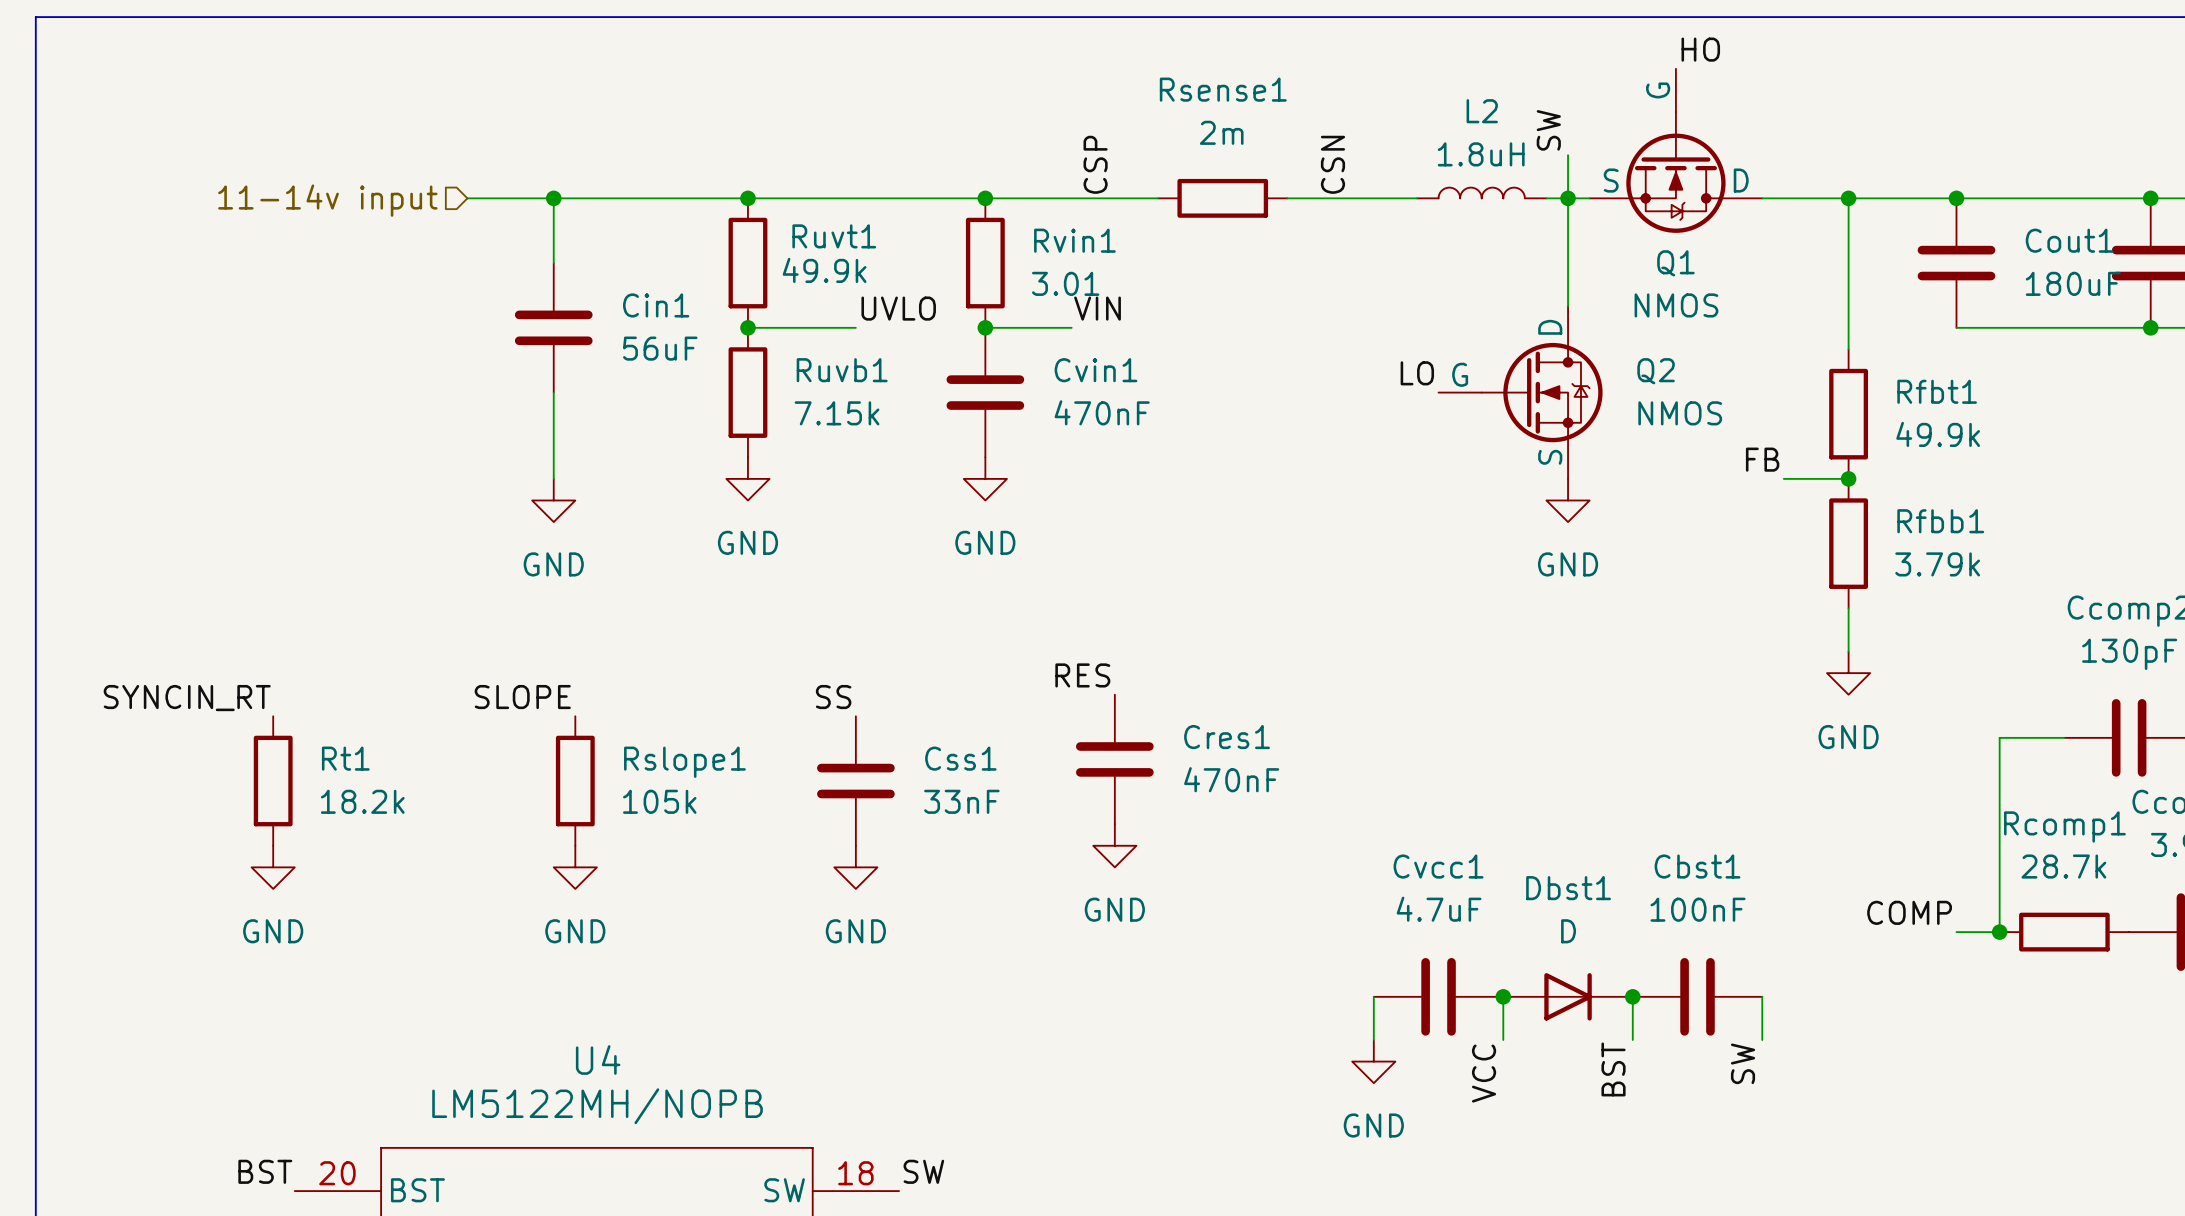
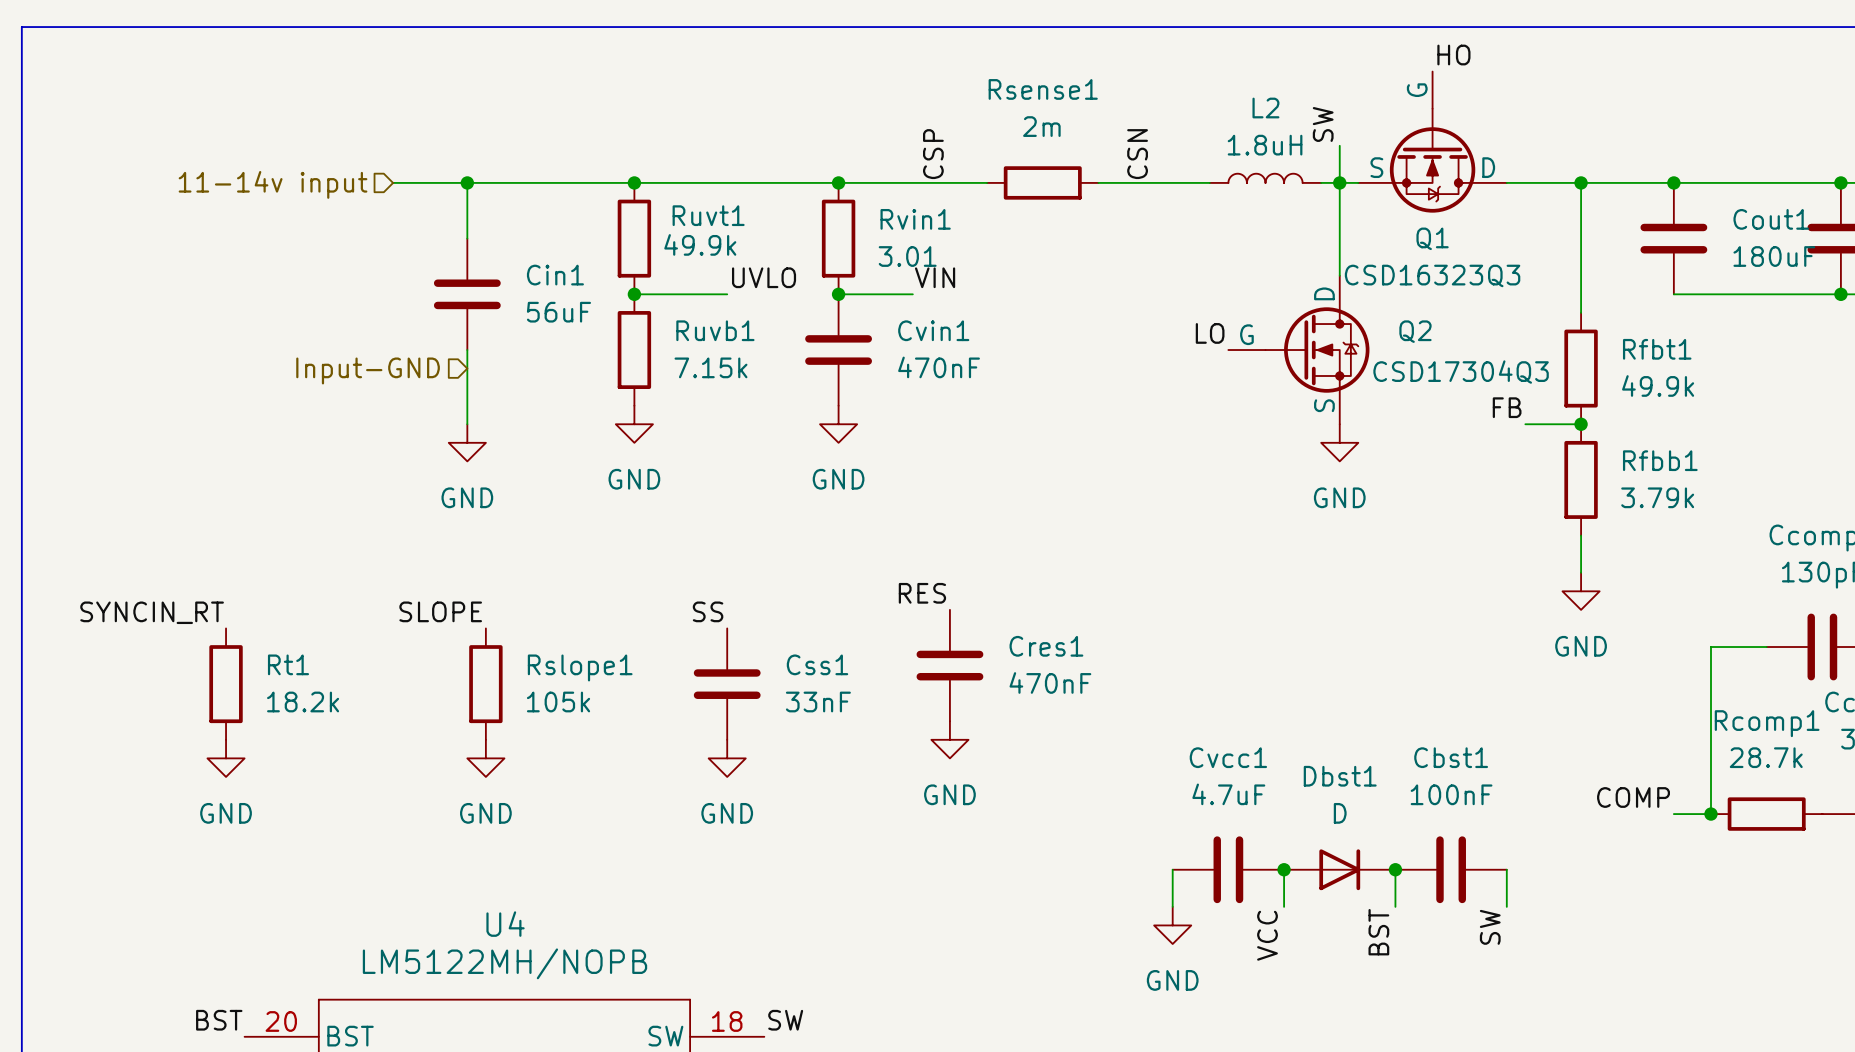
Q1 value: NMOS (1676, 305) -> CSD16323Q3 (1432, 275)
Q2 value: NMOS (1680, 413) -> CSD17304Q3 (1461, 372)
hierarchical label: none -> Input-GND (368, 370)

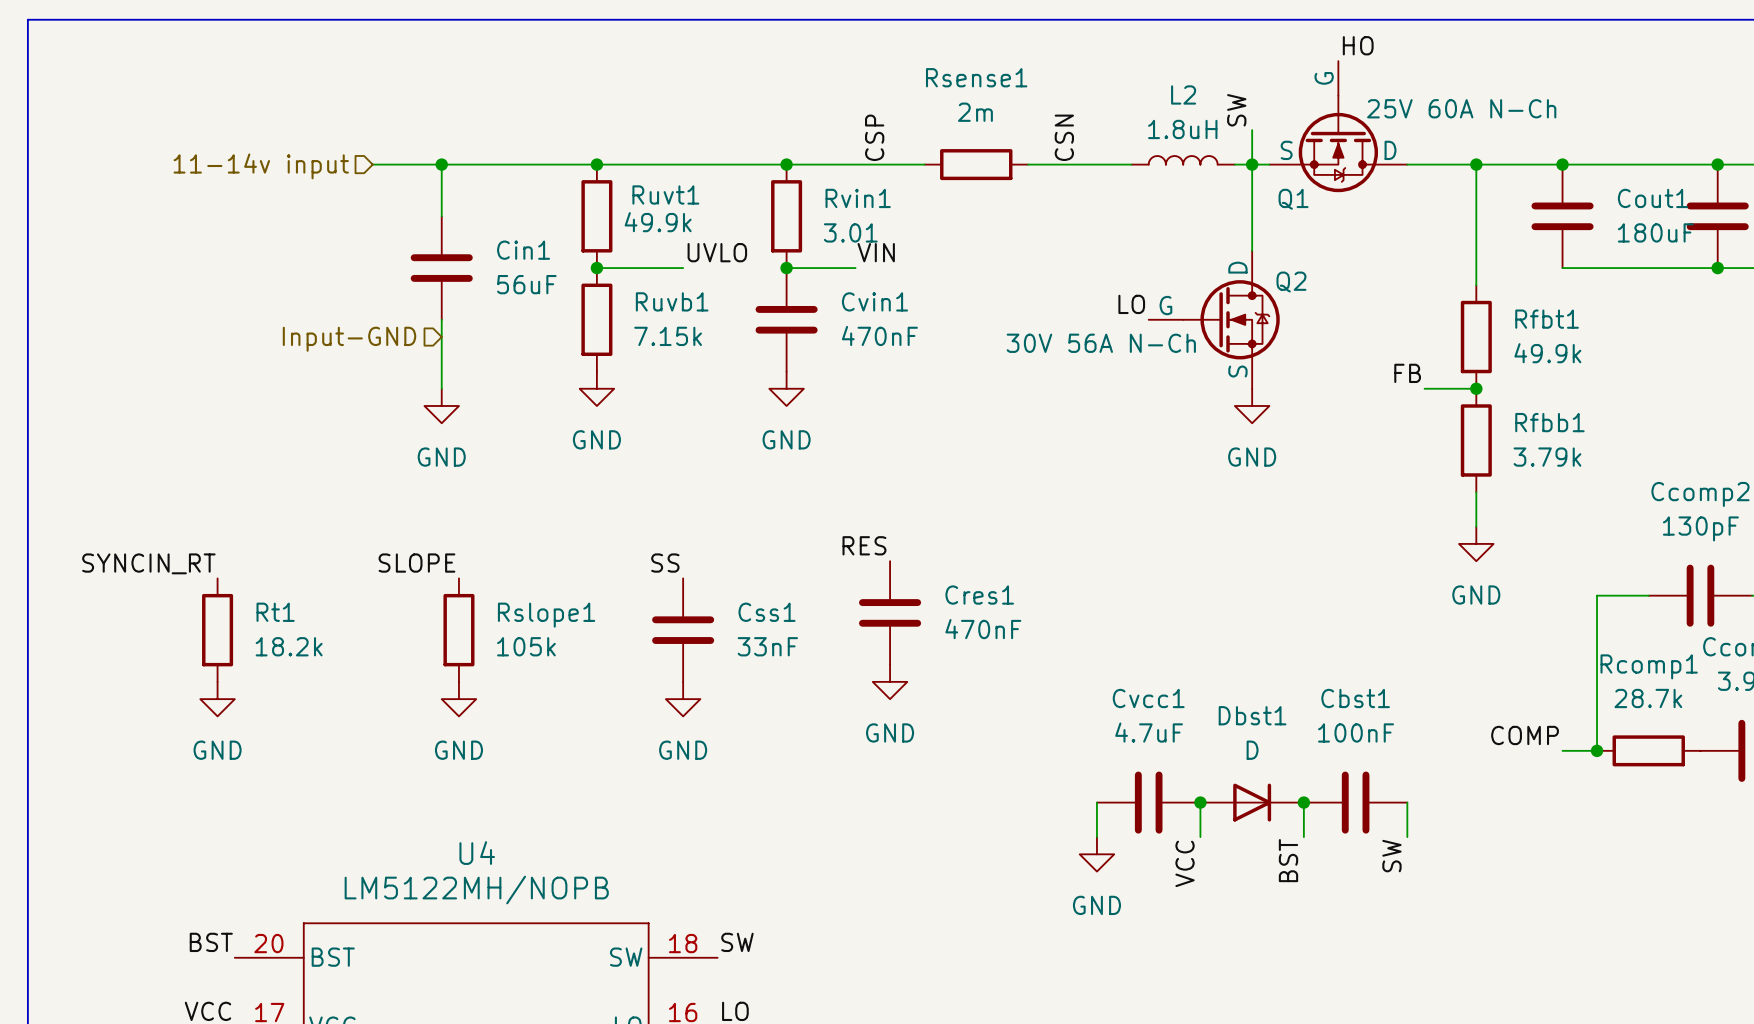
Q1 name position: Q1 (1432, 238) -> Q1 (1293, 199)
Q1 value: CSD16323Q3 (1432, 275) -> 25V 60A N-Ch (1461, 108)
Q2 name position: Q2 (1415, 331) -> Q2 (1291, 282)
Q2 value: CSD17304Q3 (1461, 372) -> 30V 56A N-Ch (1101, 343)

